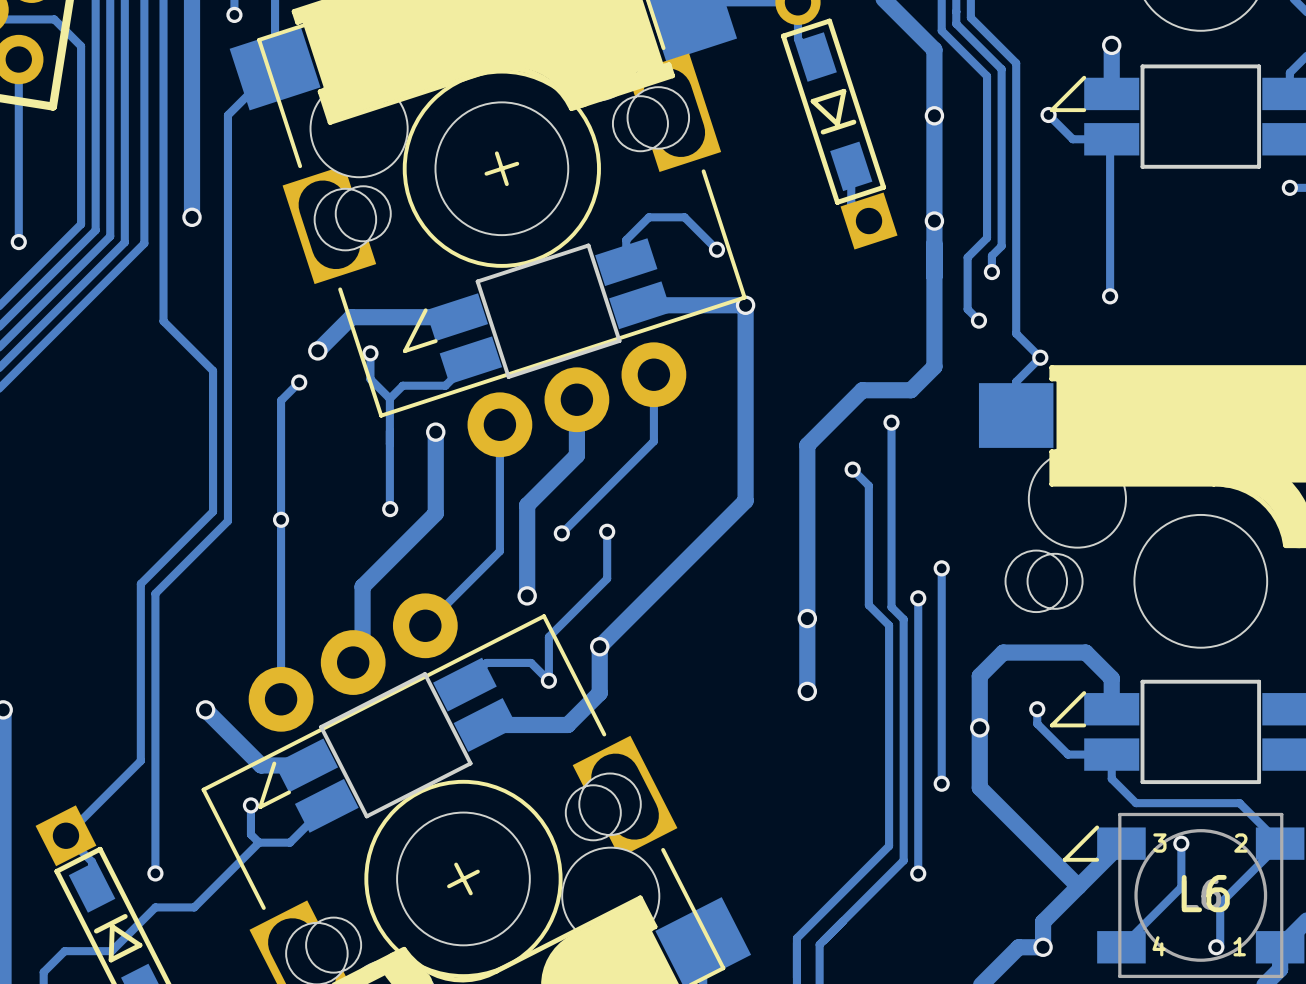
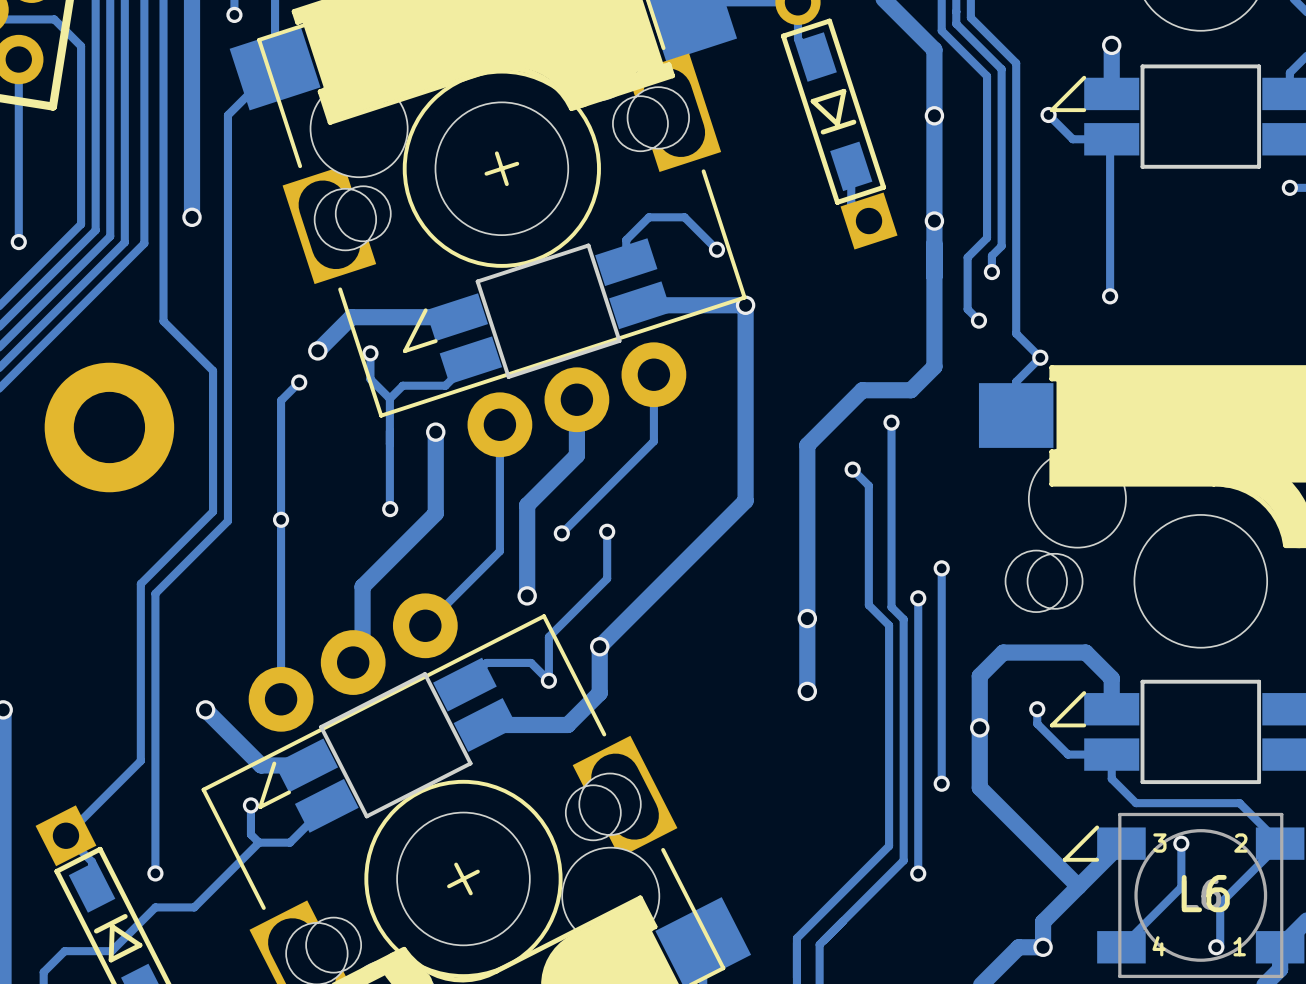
part: none -> (109, 427)

